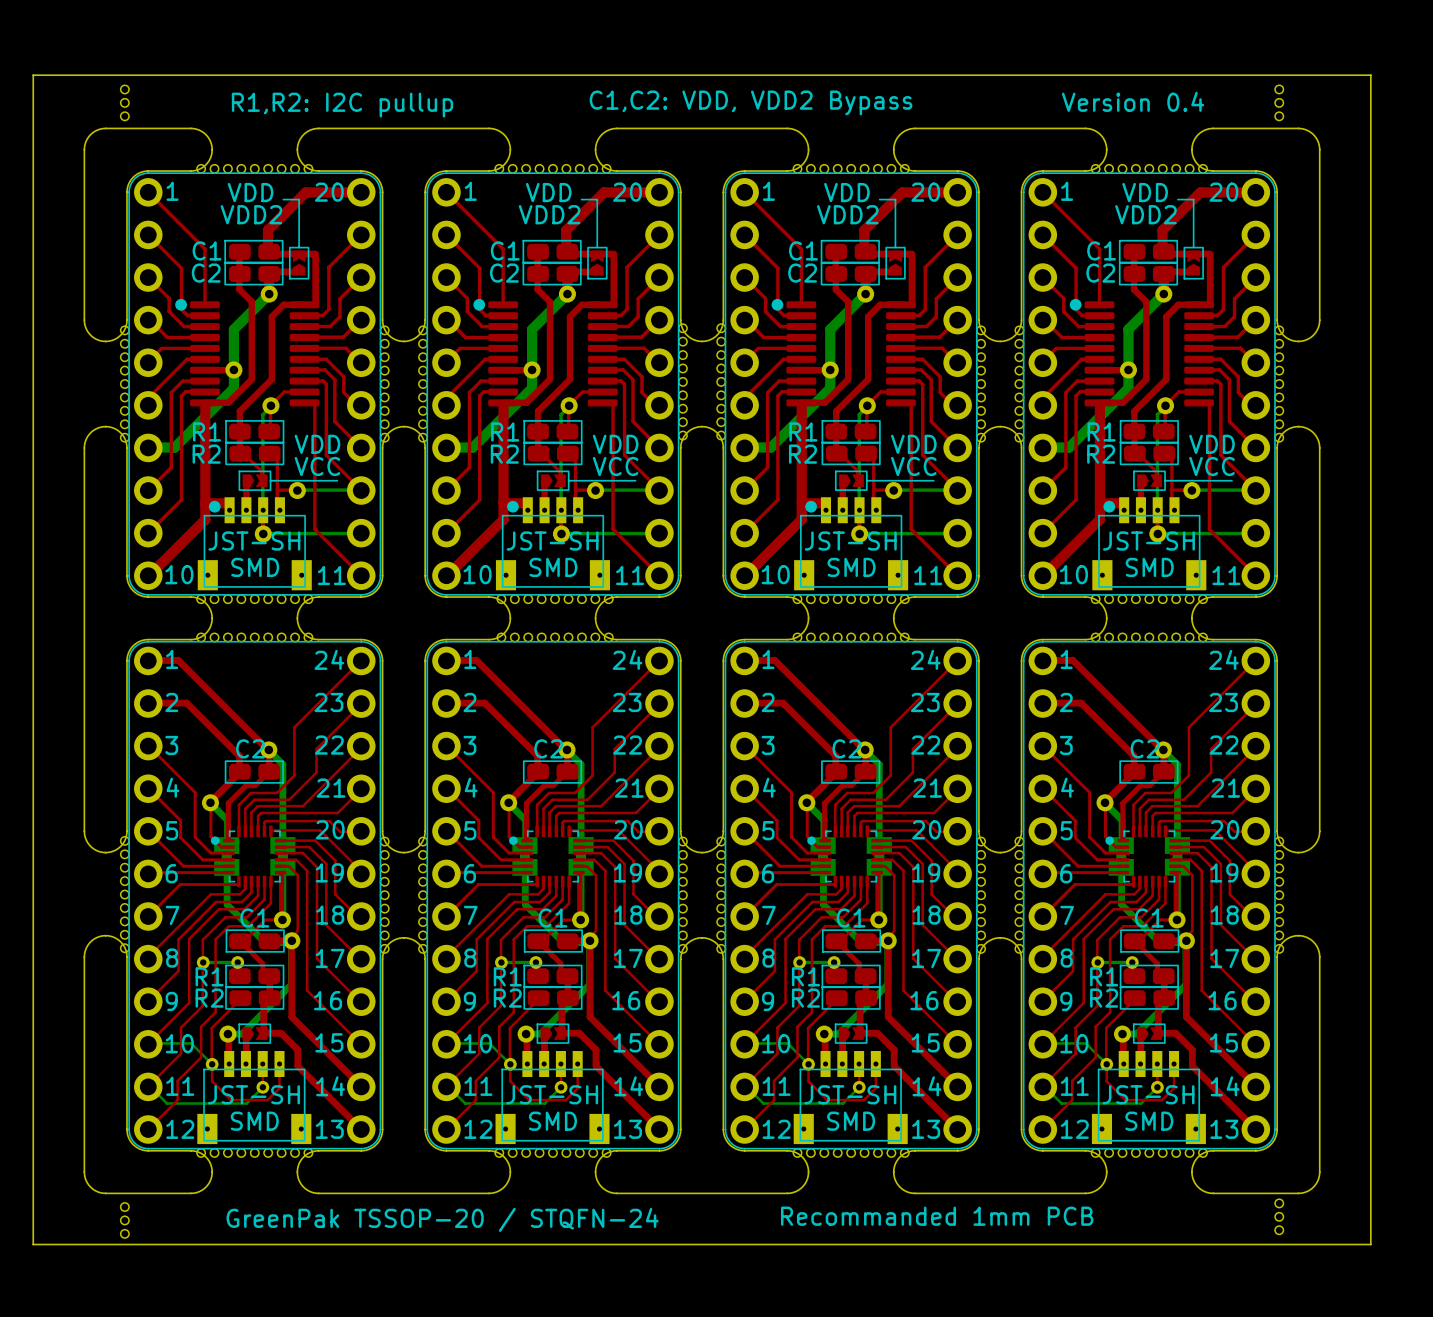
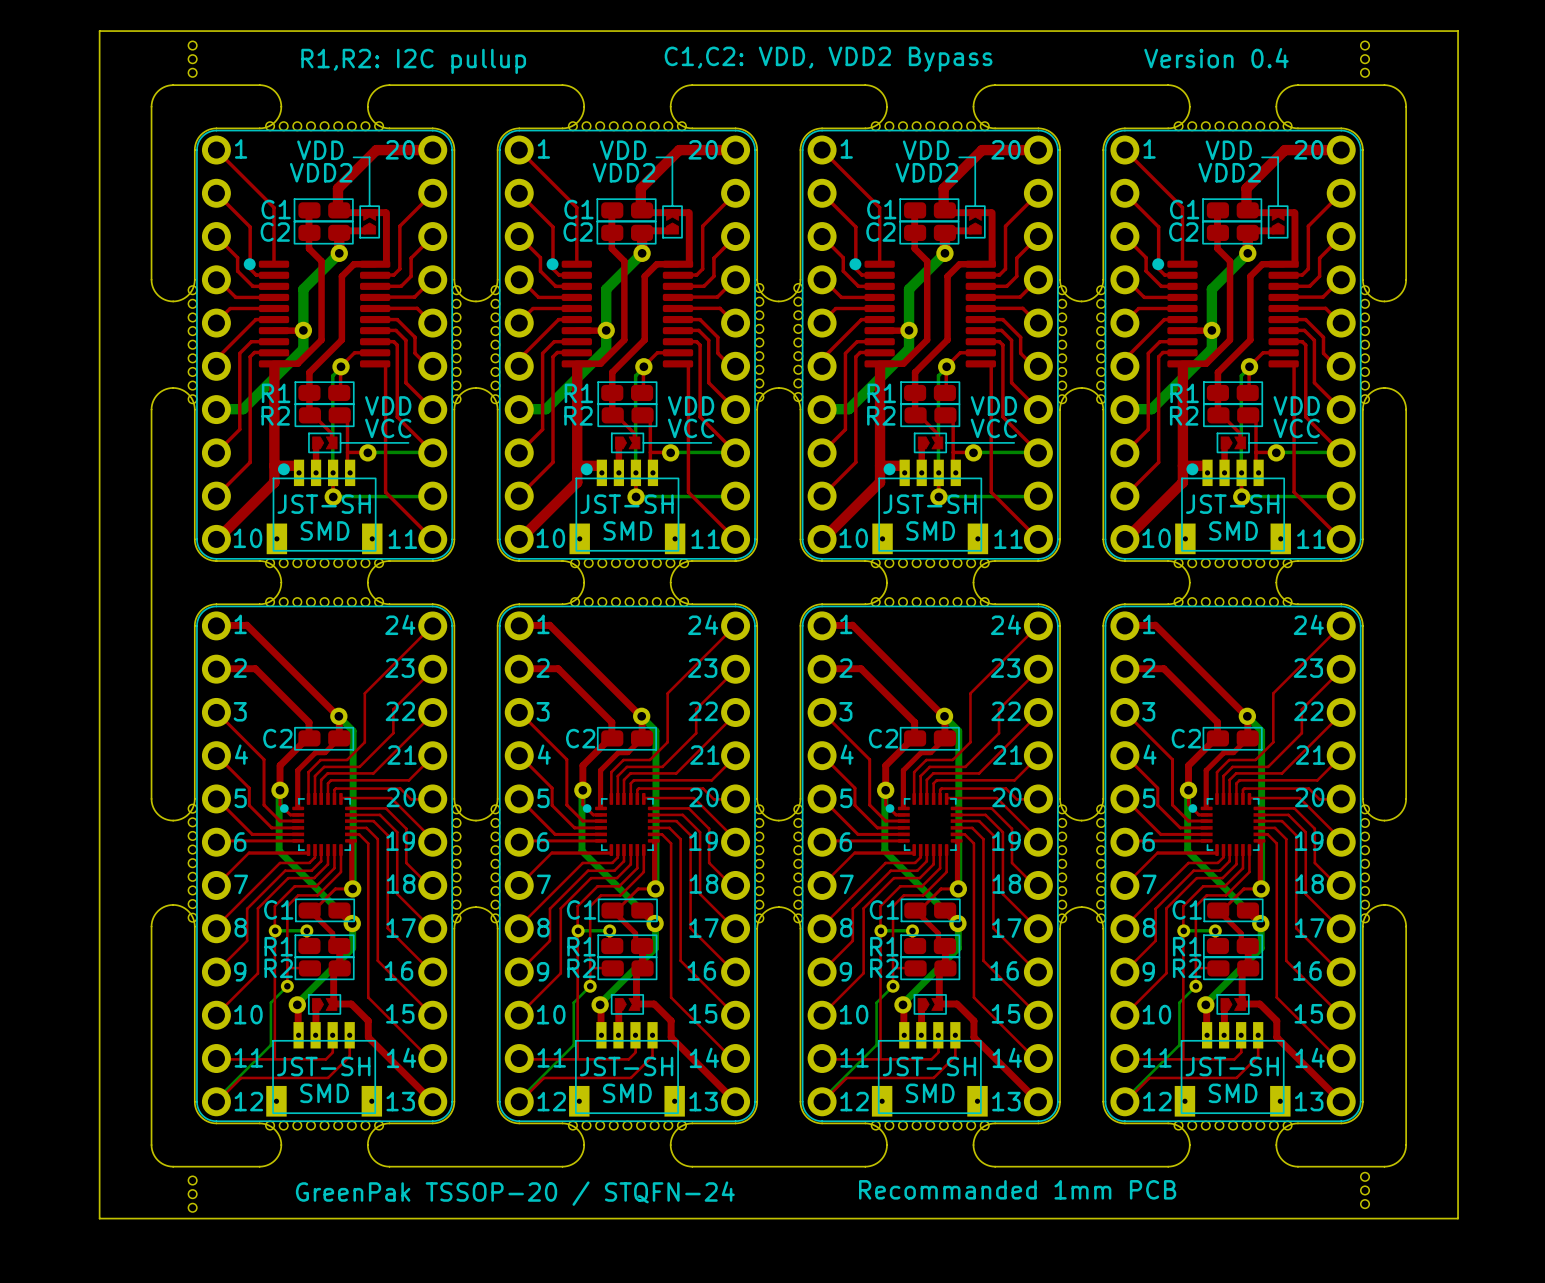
part footprint: [128, 640, 382, 1150] -> [196, 605, 454, 1123]
part footprint: [426, 640, 680, 1150] -> [498, 605, 756, 1123]
part footprint: [724, 640, 978, 1150] -> [801, 605, 1059, 1123]
part footprint: [1022, 640, 1276, 1150] -> [1104, 605, 1362, 1123]

